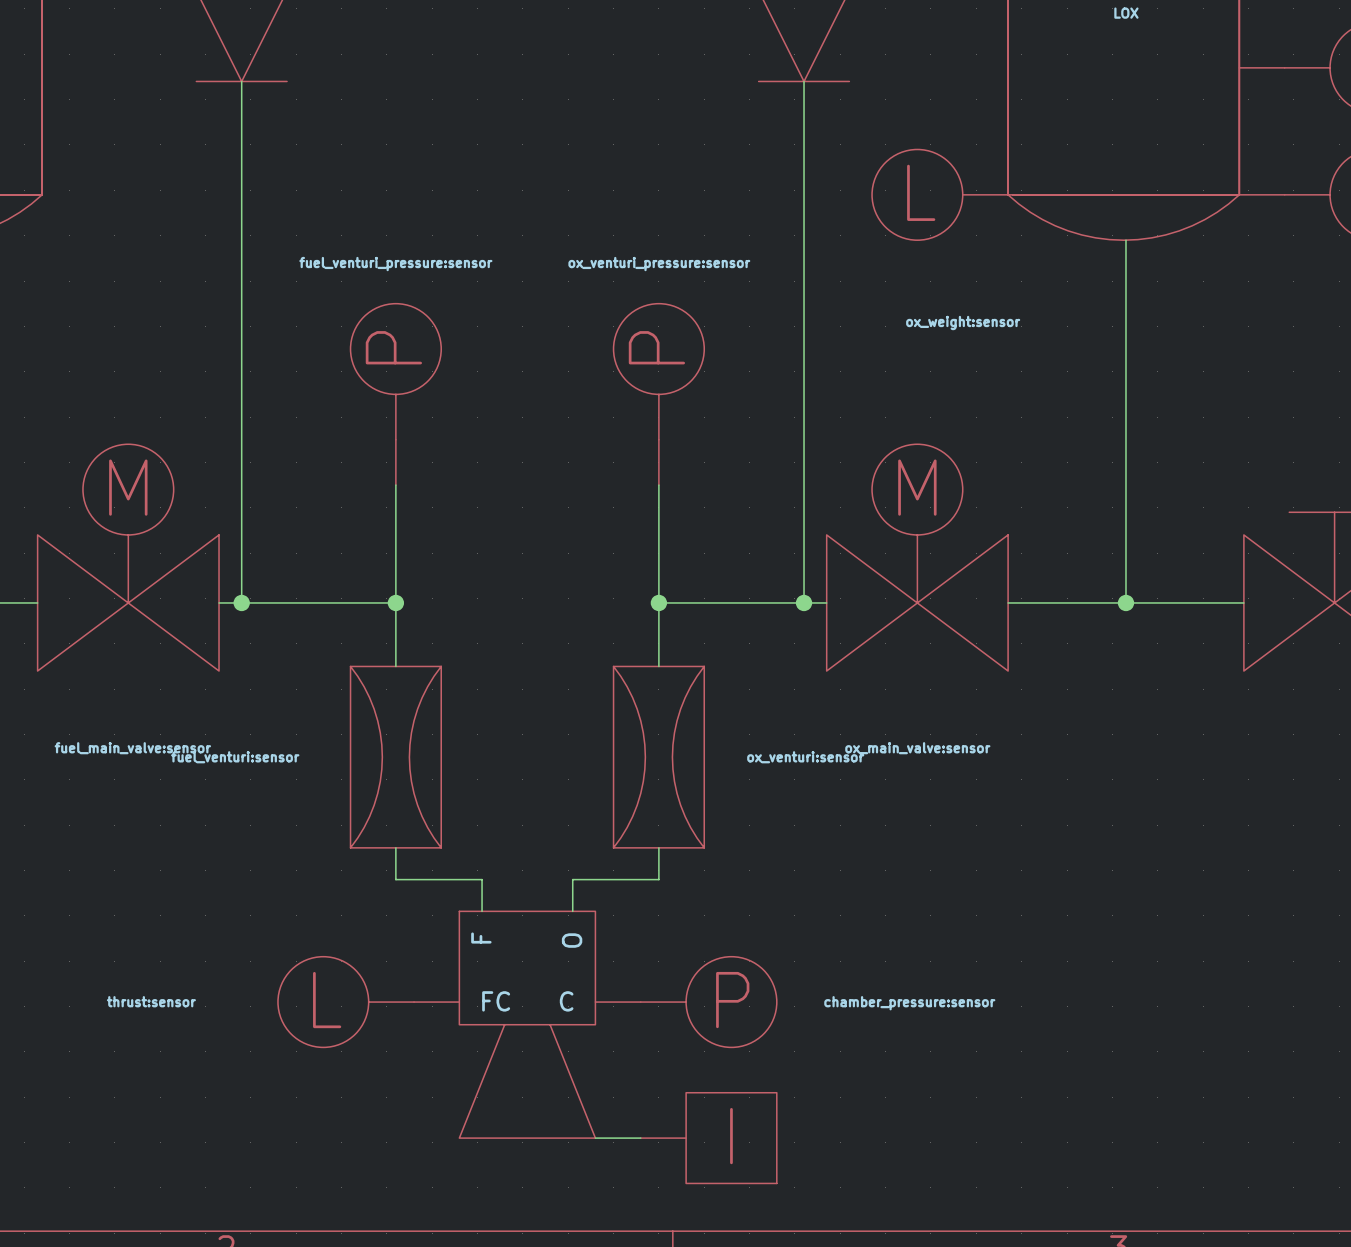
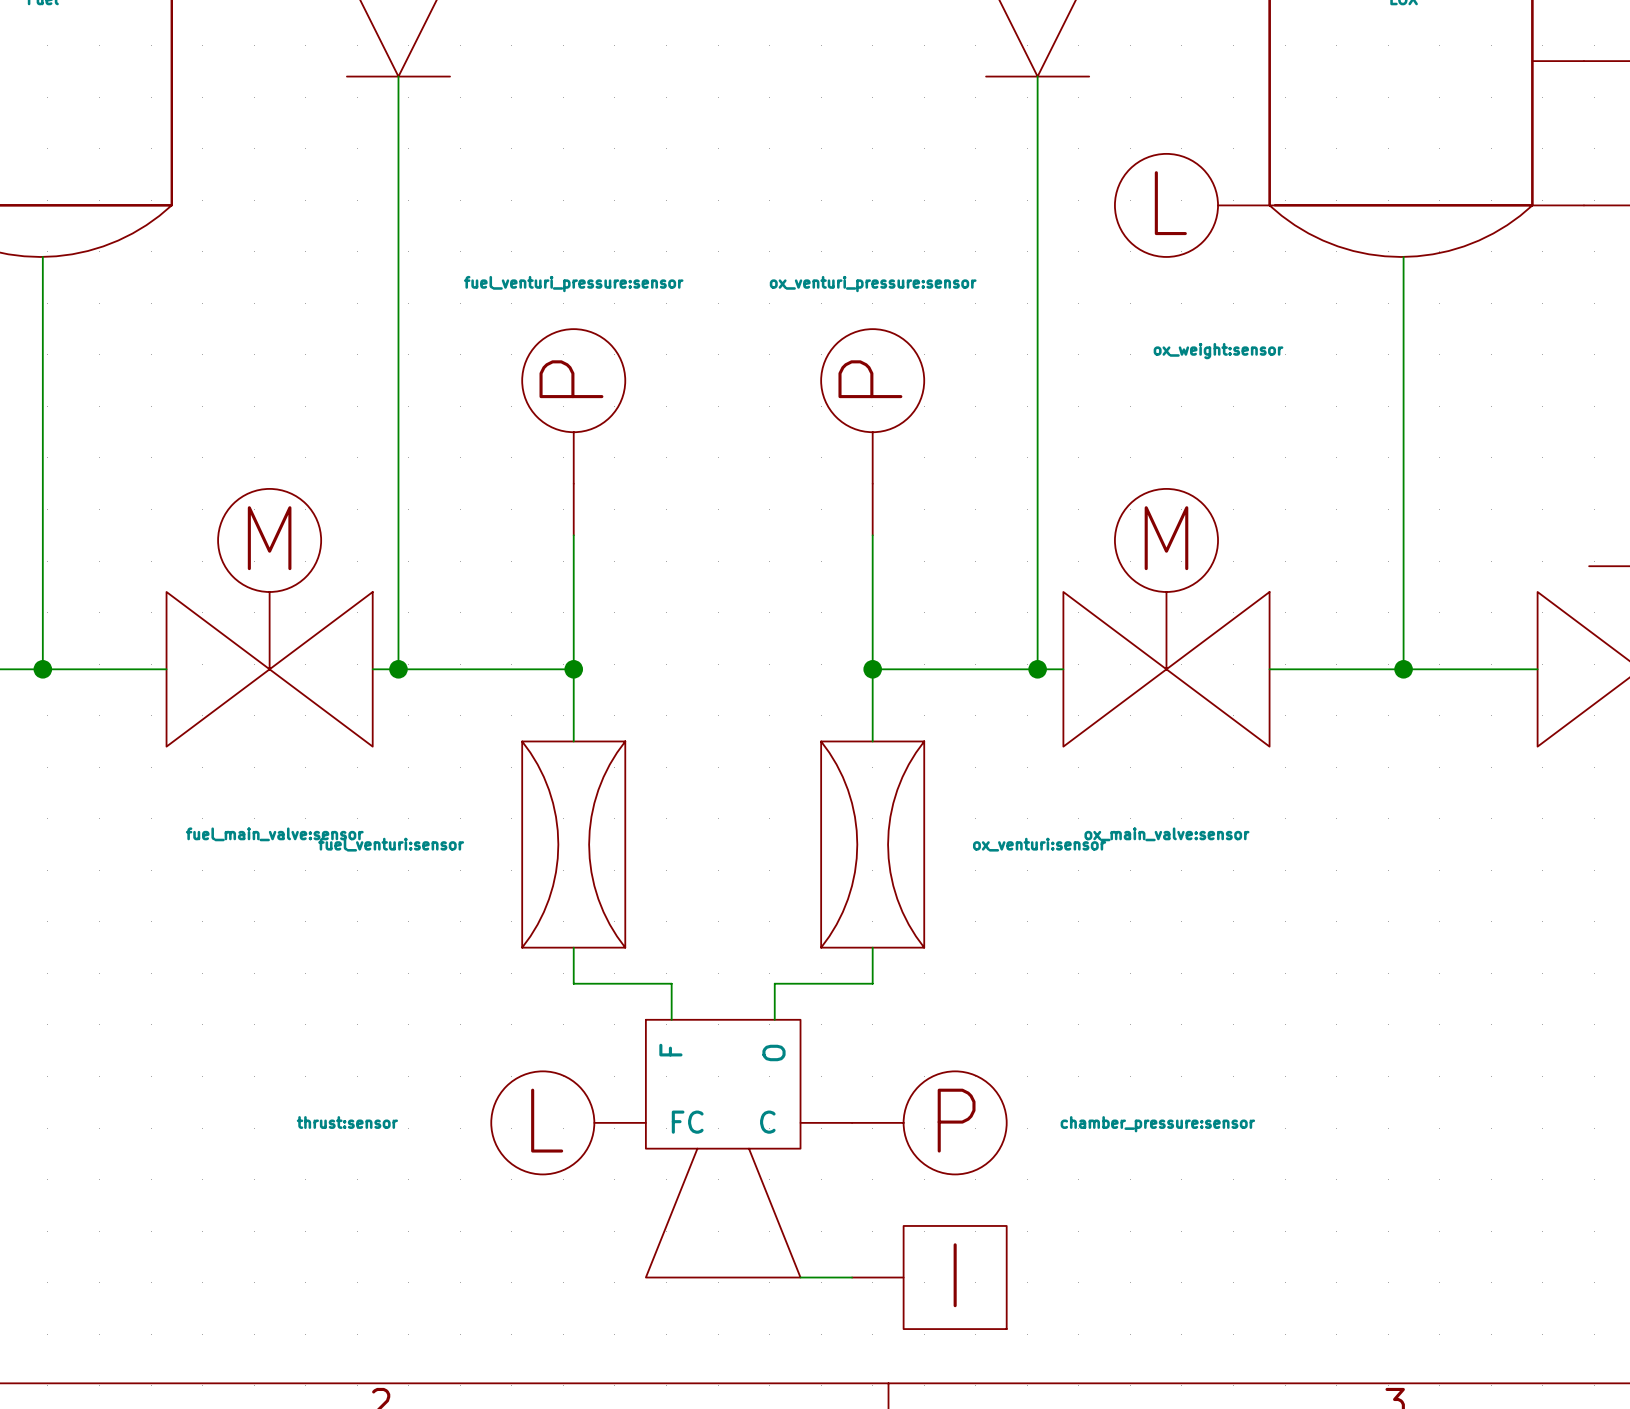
part: thrust:sensor (368, 1002) -> none
part: none -> thrust:sensor (568, 1122)

